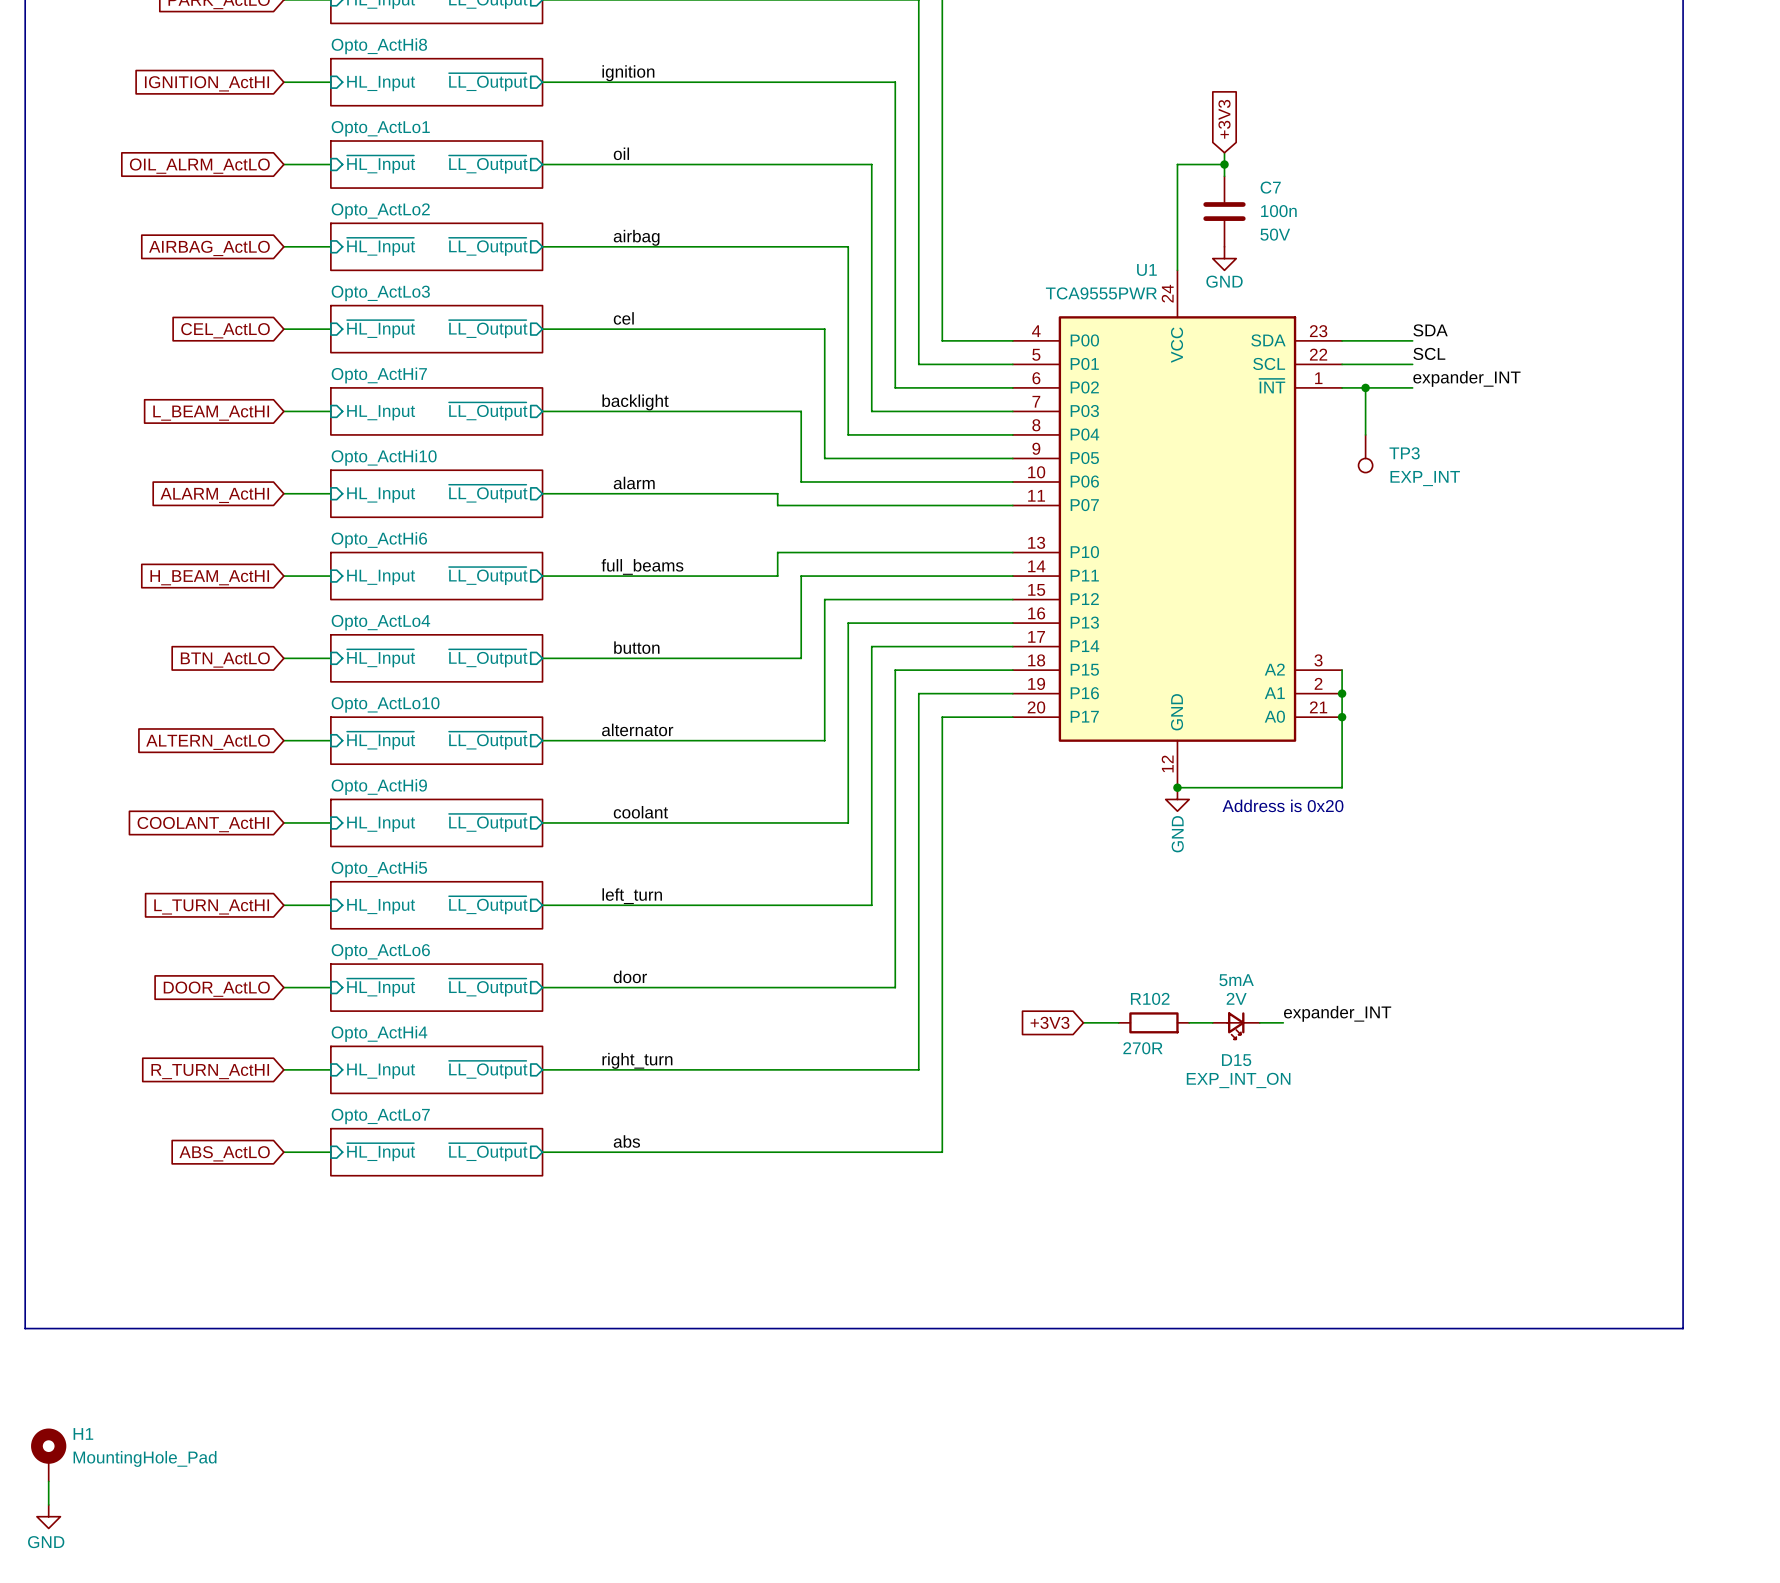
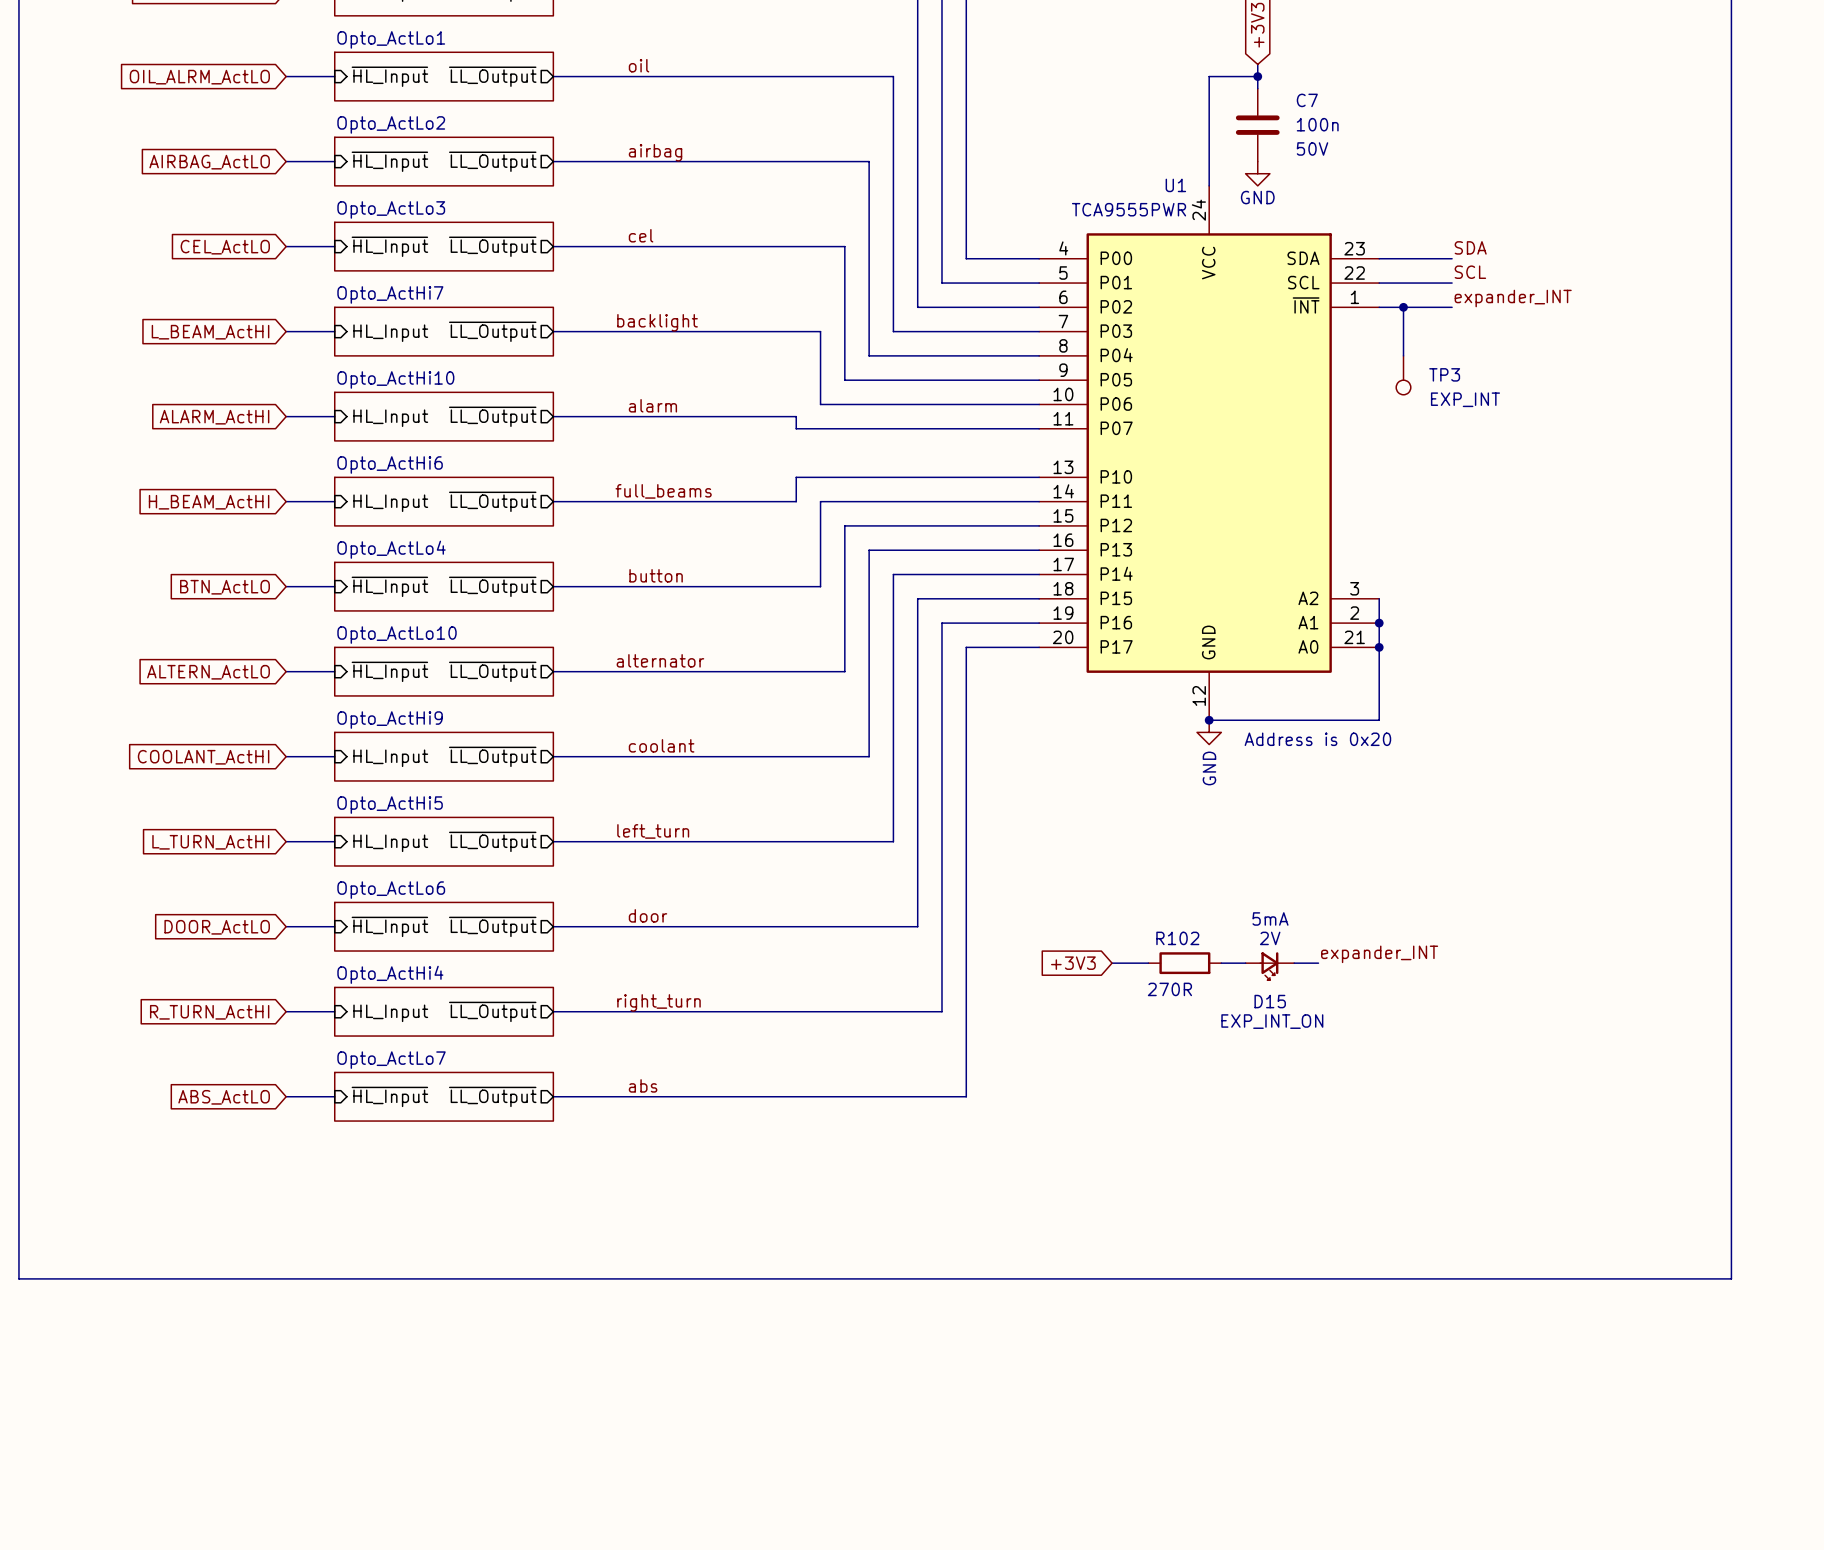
H1: MountingHole_Pad (48, 1454) -> none
wire: (48, 1481) (48, 1504) -> none
power symbol: GND (48, 1516) -> none

